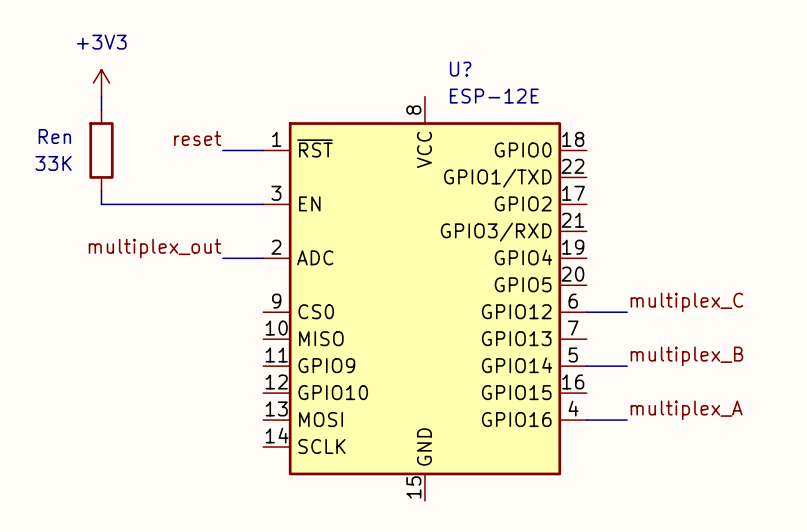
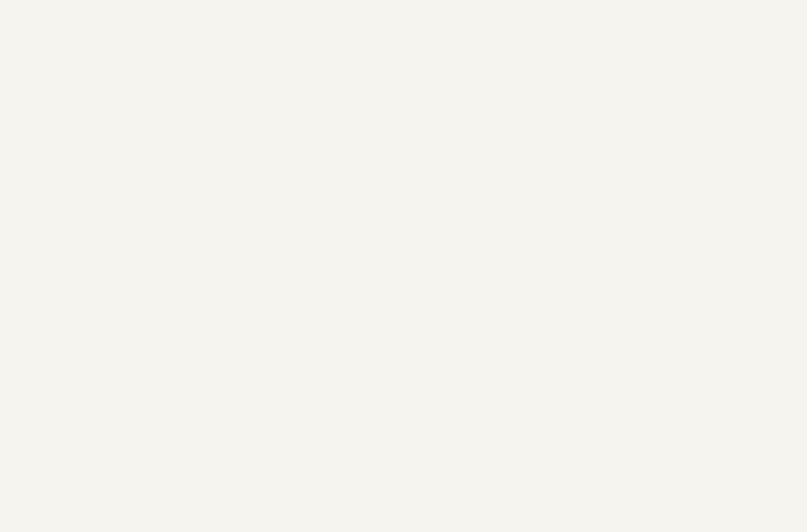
power symbol: +3V3 (101, 83) -> none
wire: (101, 96) (101, 110) -> none
label: reset (197, 138) -> none
Ren: 33K (101, 150) -> none
wire: (222, 150) (263, 150) -> none
wire: (101, 190) (101, 204) (263, 204) -> none
label: multiplex_out (154, 248) -> none
wire: (222, 258) (263, 258) -> none
U?: ESP-12E (424, 298) -> none
label: multiplex_C (686, 302) -> none
wire: (586, 312) (627, 312) -> none
label: multiplex_B (686, 356) -> none
wire: (586, 366) (627, 366) -> none
label: multiplex_A (686, 410) -> none
wire: (586, 420) (627, 420) -> none

